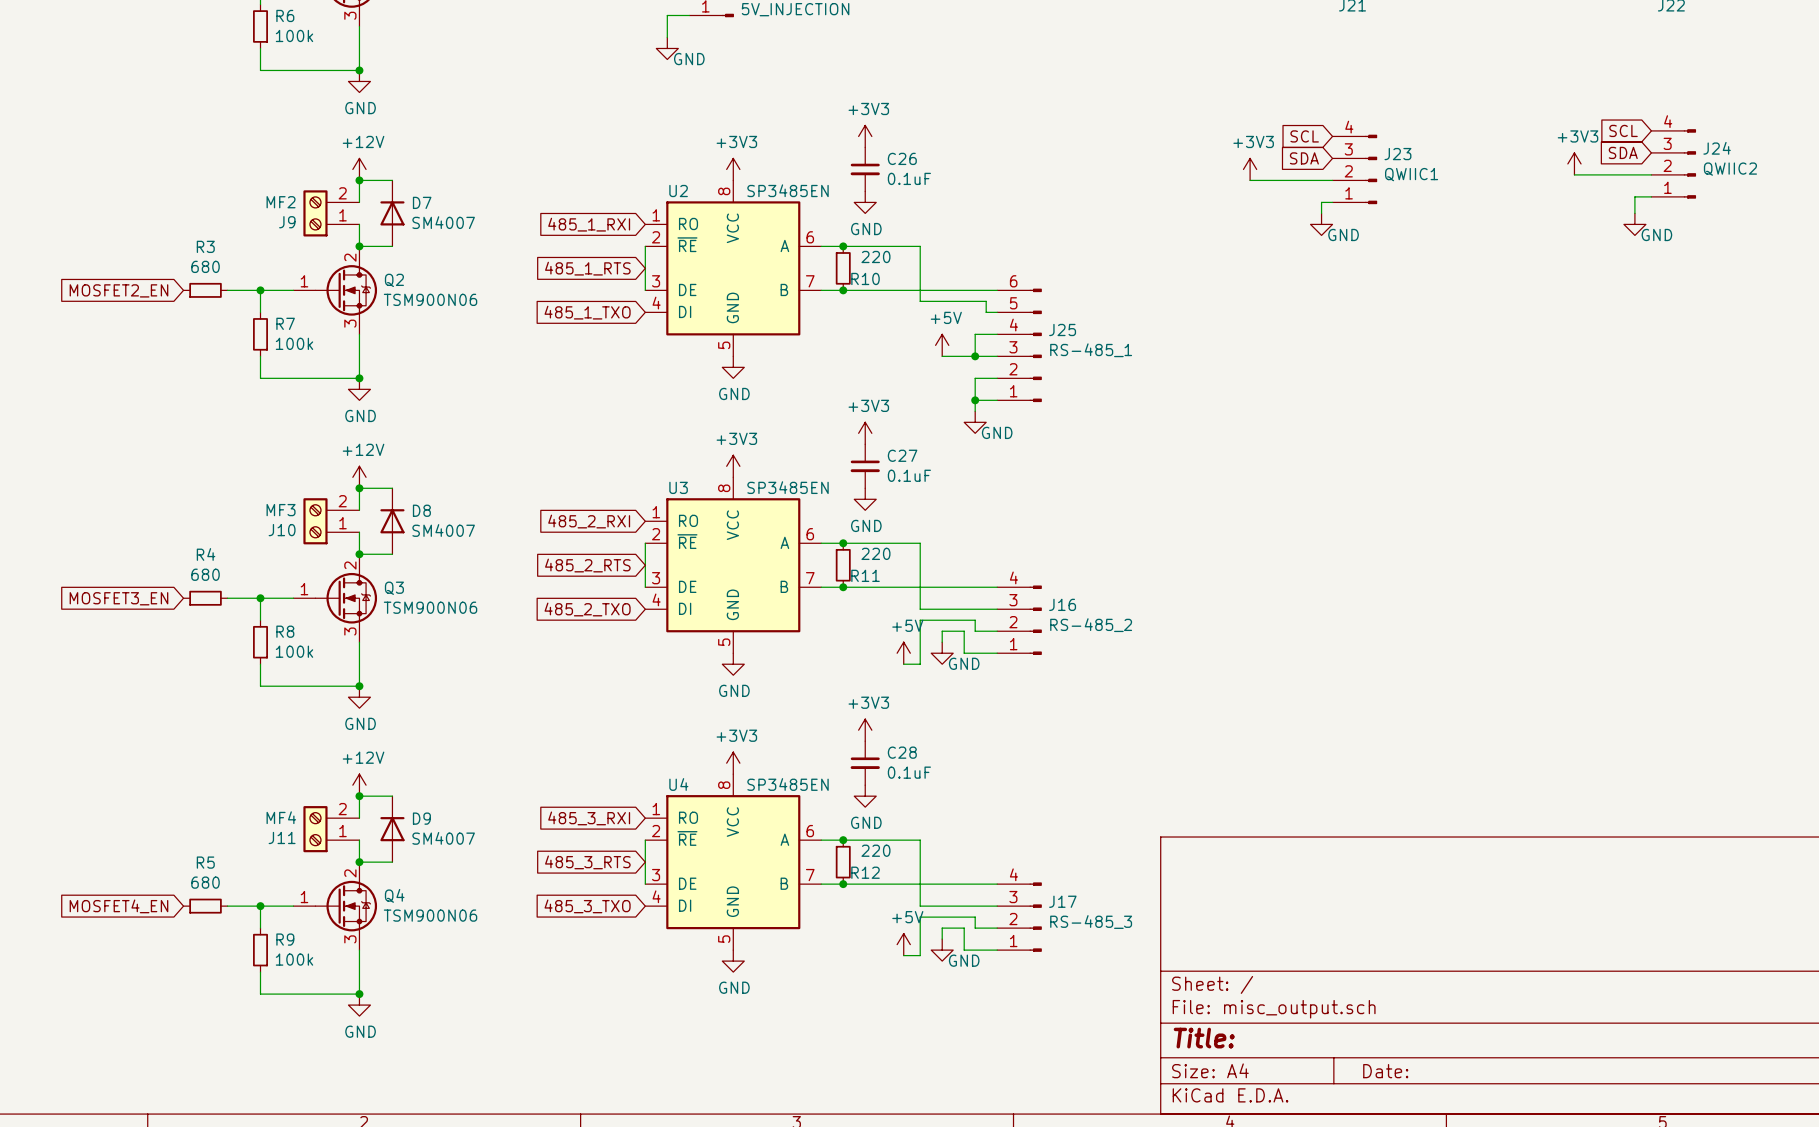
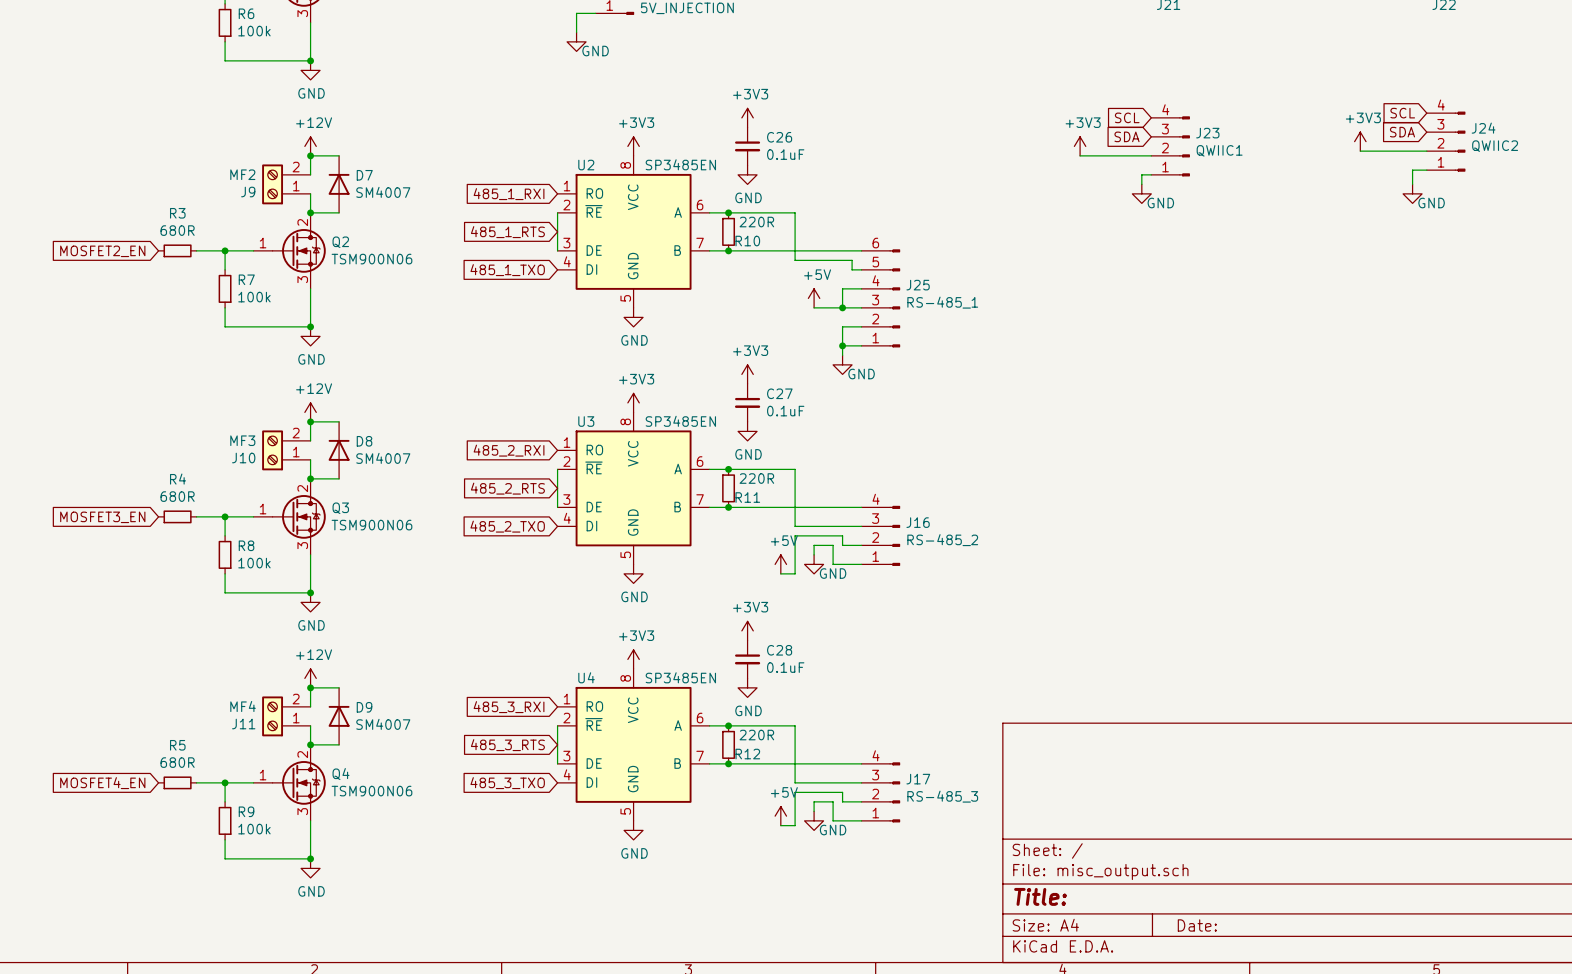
R10 value: 220 (875, 256) -> 220R (756, 222)
R3 value: 680 (205, 266) -> 680R (177, 230)
R11 value: 220 (875, 553) -> 220R (756, 478)
R4 value: 680 (205, 574) -> 680R (177, 496)
R12 value: 220 (875, 850) -> 220R (756, 735)
R5 value: 680 (205, 882) -> 680R (177, 762)

